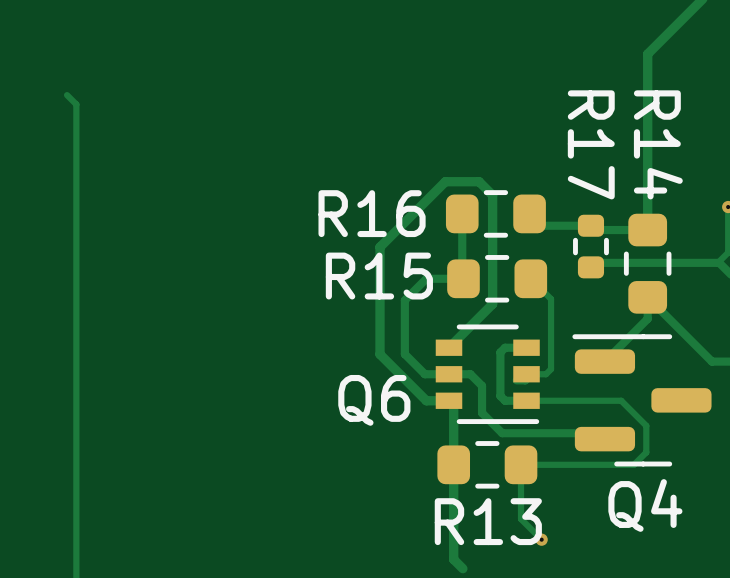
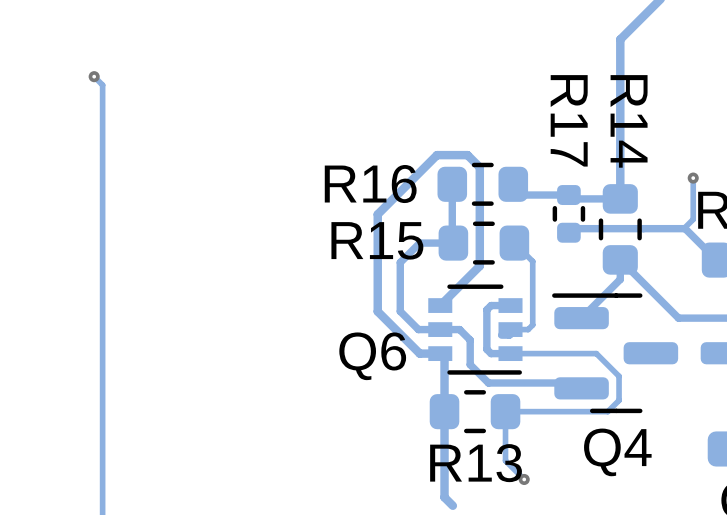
via: none -> (94, 76)

